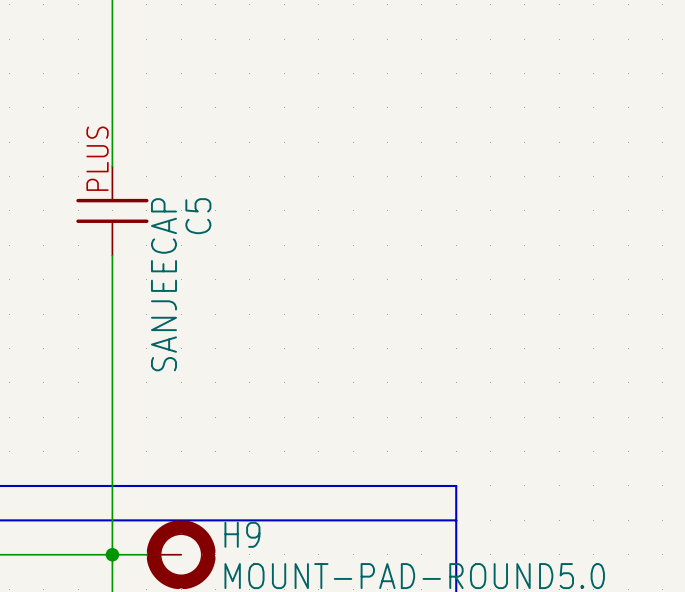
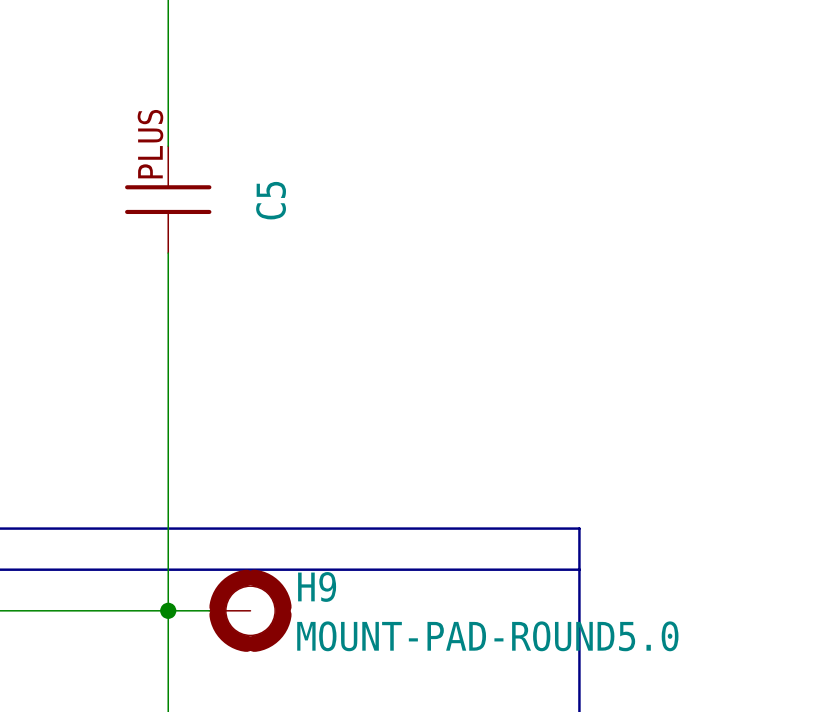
C5 value: SANJEECAP (163, 284) -> none

